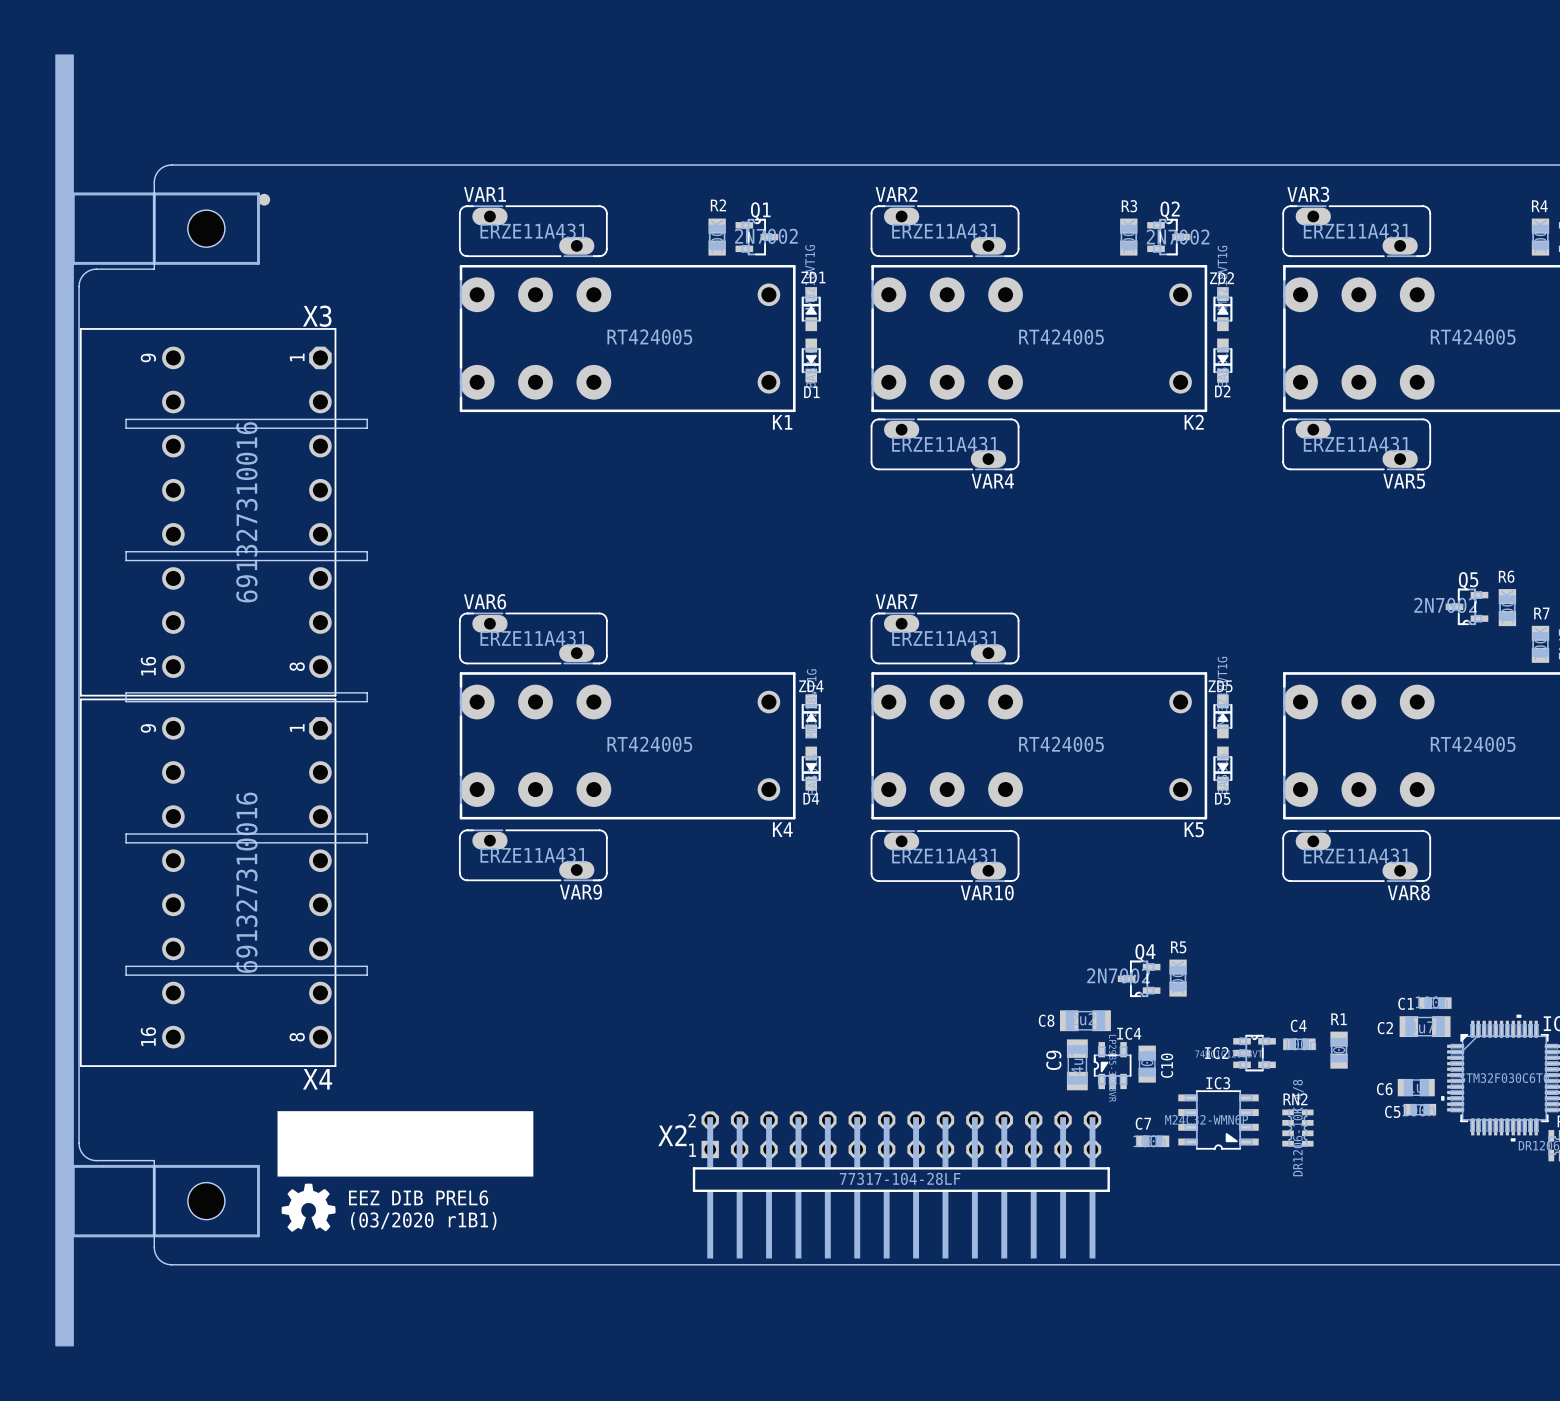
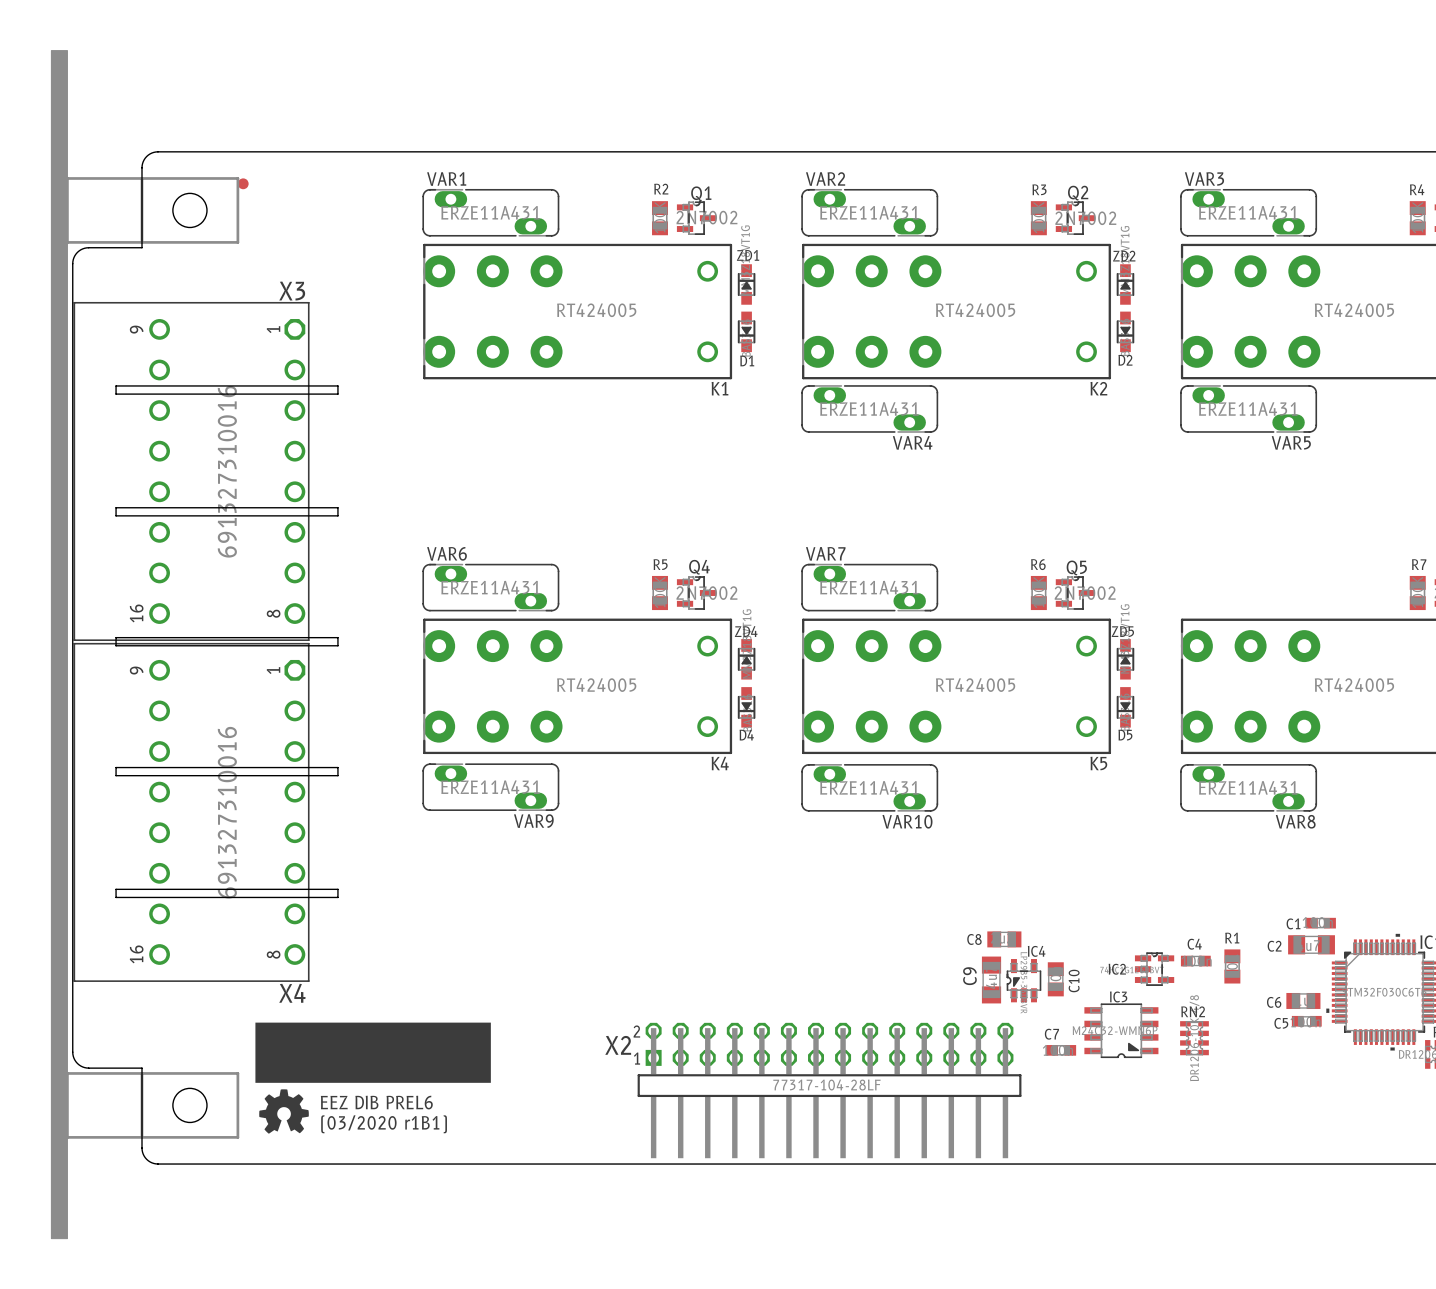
Q5 rotation: 0° (1466, 606) -> 180° (1075, 593)
Q5 position: (1466, 606) -> (1075, 593)
R6 position: (1507, 607) -> (1038, 593)
Q4 rotation: 0° (1139, 978) -> 180° (696, 593)
Q4 position: (1139, 978) -> (696, 593)
R5 position: (1178, 978) -> (660, 593)
C8 footprint: [1059, 1010, 1111, 1032] -> [987, 931, 1022, 948]

